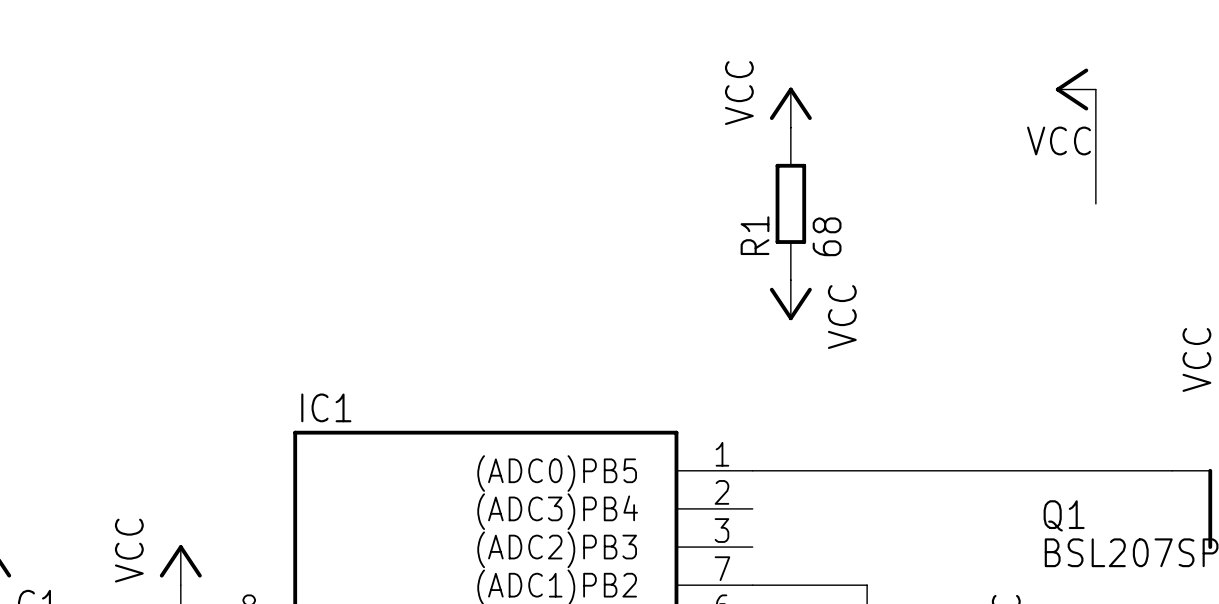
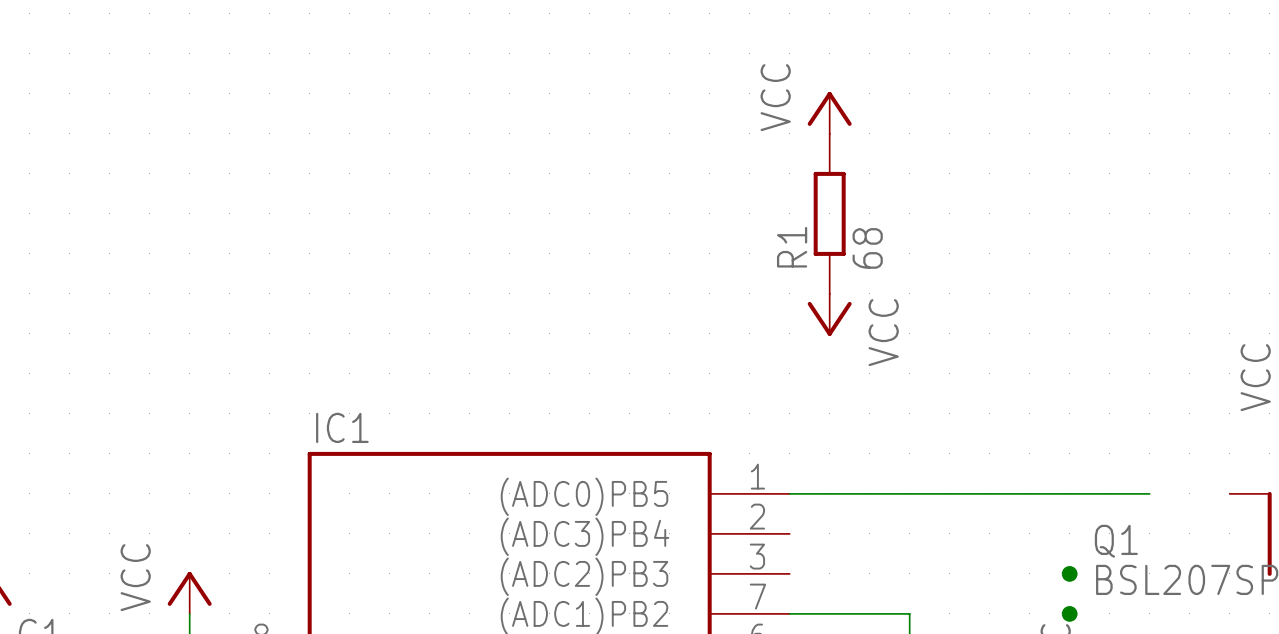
power symbol: VCC (1075, 89) -> none
wire: (1095, 89) (1095, 203) -> none
wire: (1095, 470) (1172, 470) -> none
junction: none -> (1069, 573)
junction: none -> (1069, 613)

